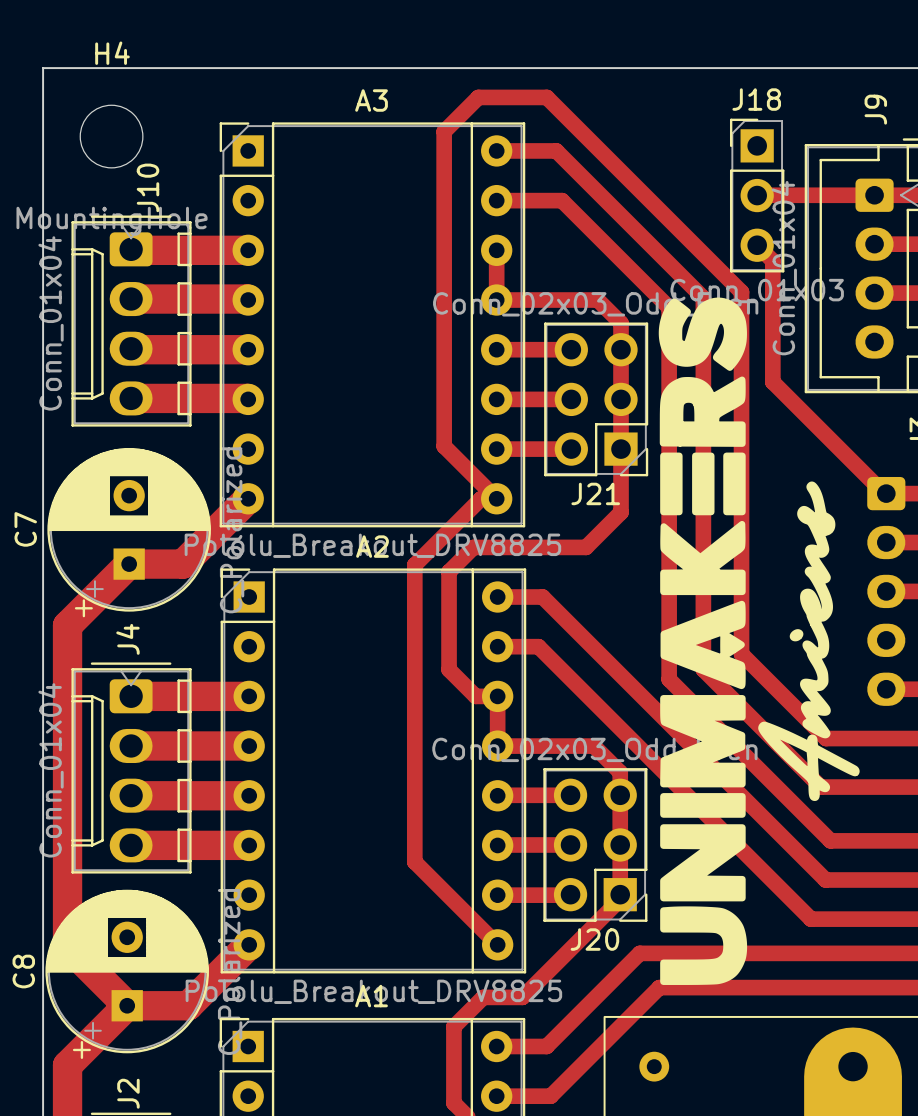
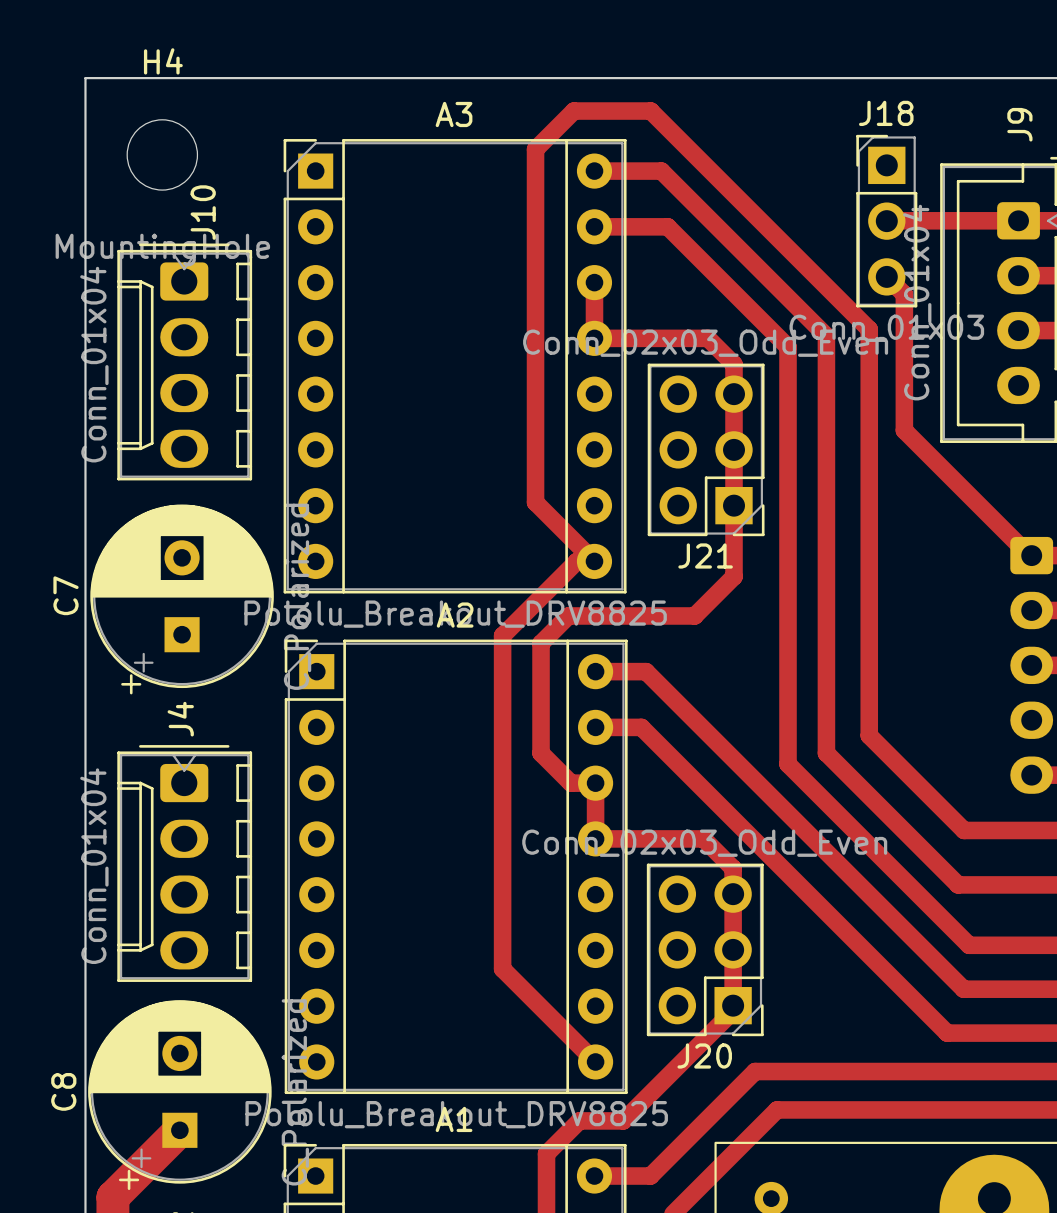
track: (131, 249) (248, 250) -> none
drawing: [658, 297, 860, 985] -> none
track: (131, 299) (248, 300) -> none
track: (131, 348) (248, 349) -> none
track: (496, 349) (571, 349) -> none
track: (131, 398) (248, 399) -> none
track: (496, 399) (571, 399) -> none
track: (496, 449) (571, 449) -> none
track: (248, 498) (182, 564) (129, 564) (67, 625) (67, 946) (127, 1005) (188, 1005) (249, 944) -> none
track: (131, 696) (249, 696) -> none
track: (131, 745) (249, 745) -> none
track: (131, 795) (249, 795) -> none
track: (570, 795) (497, 795) -> none
track: (570, 844) (497, 845) -> none
track: (131, 845) (249, 845) -> none
track: (570, 894) (497, 895) -> none

